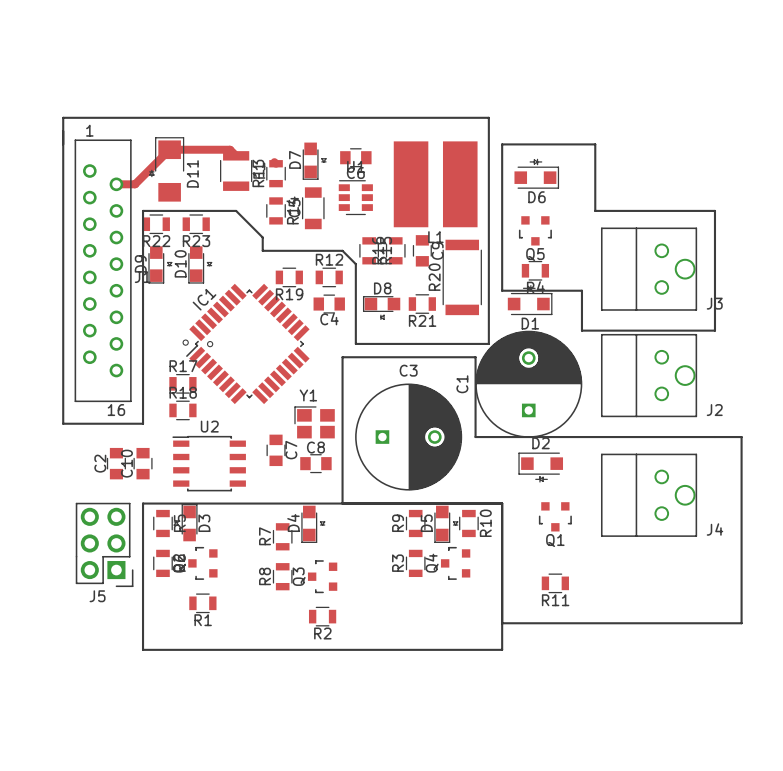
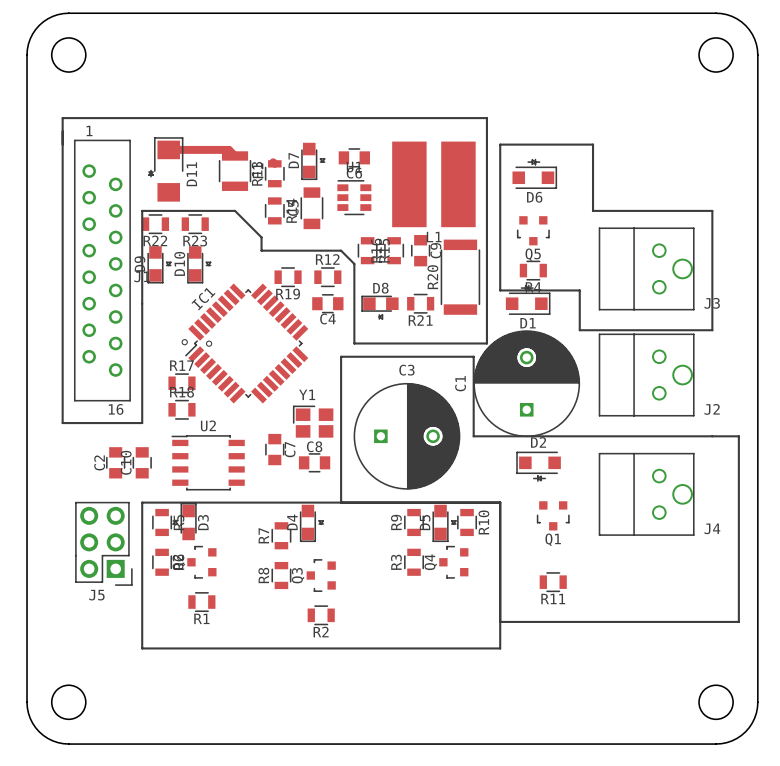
board edge: none -> (68, 13) (716, 13) (732, 16) (745, 25) (754, 39) (757, 54) (757, 702) (754, 718) (745, 731) (732, 740) (716, 744) (68, 744) (52, 740) (39, 731) (30, 718) (27, 702) (27, 54) (30, 39) (39, 25) (52, 16) (68, 13)
round board edge: none -> [51, 37, 87, 73]
round board edge: none -> [698, 37, 734, 73]
top track: (169, 149) (135, 184) (116, 184) -> none
round board edge: none -> [51, 684, 87, 720]
round board edge: none -> [698, 684, 734, 720]

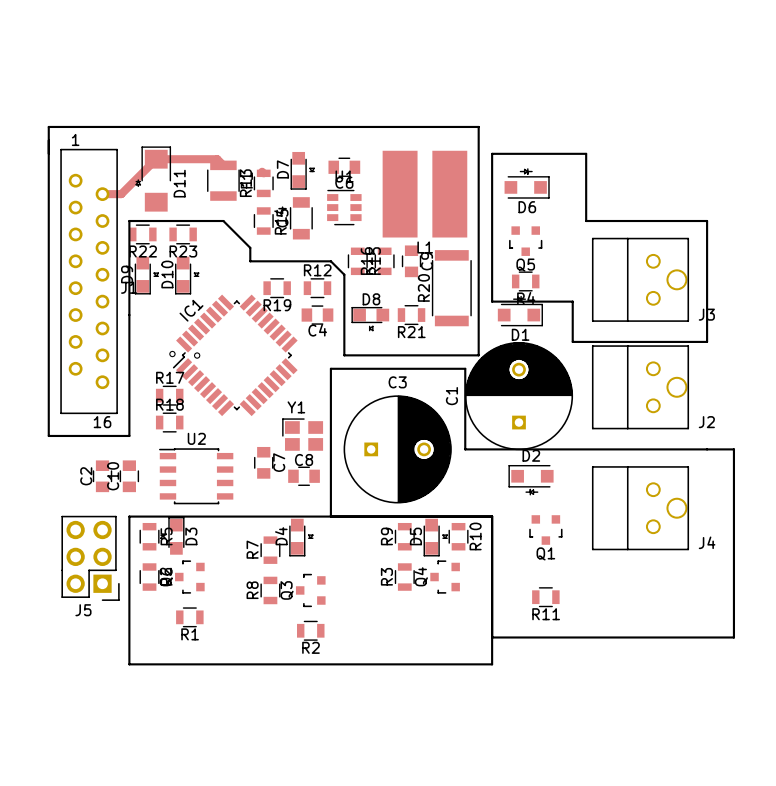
board edge: (68, 13) (716, 13) (732, 16) (745, 25) (754, 39) (757, 54) (757, 702) (754, 718) (745, 731) (732, 740) (716, 744) (68, 744) (52, 740) (39, 731) (30, 718) (27, 702) (27, 54) (30, 39) (39, 25) (52, 16) (68, 13) -> none
round board edge: [51, 37, 87, 73] -> none
round board edge: [698, 37, 734, 73] -> none
top track: none -> (156, 159) (121, 194) (102, 194)
round board edge: [51, 684, 87, 720] -> none
round board edge: [698, 684, 734, 720] -> none

